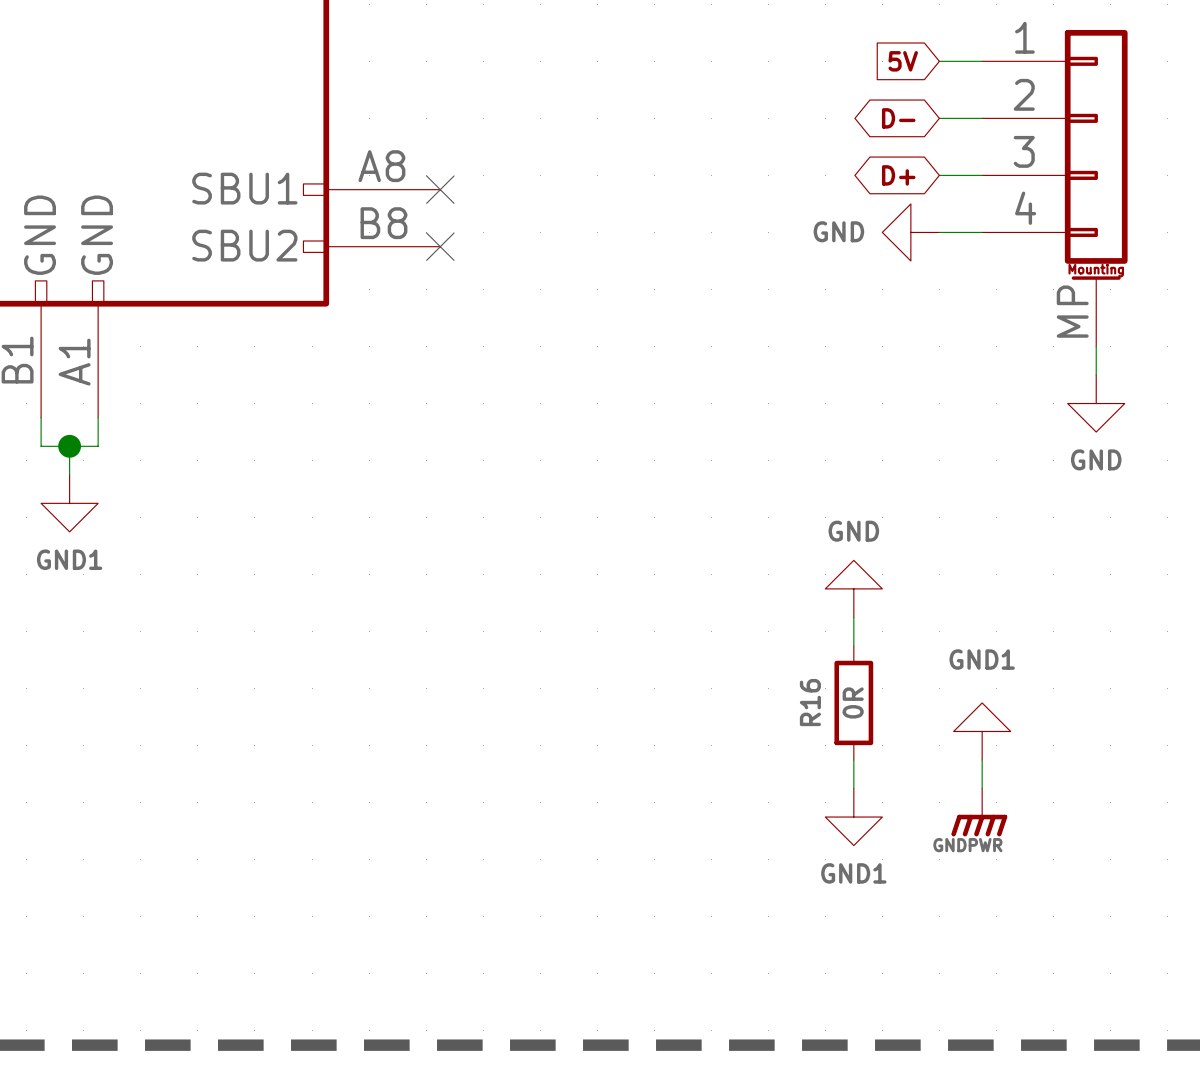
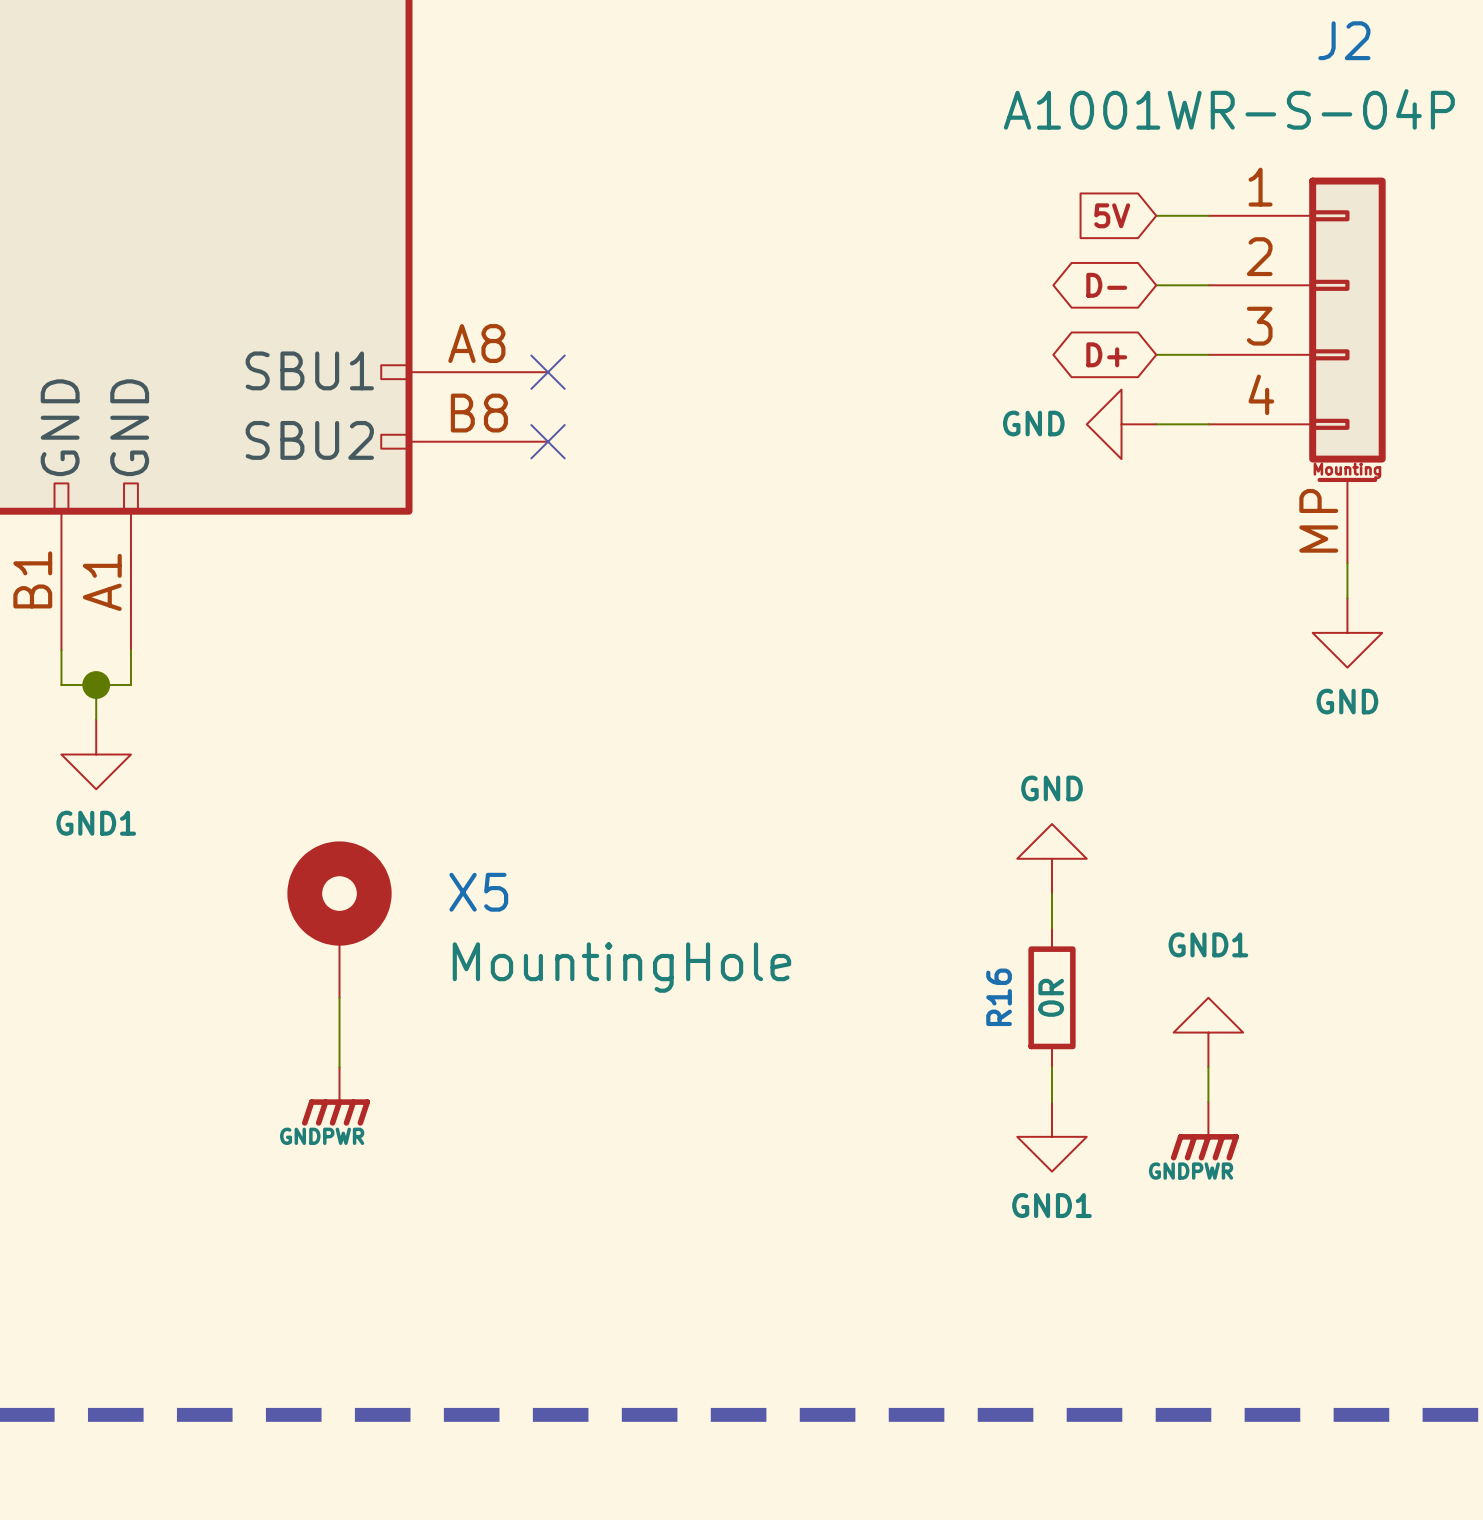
X5: none -> MountingHole (339, 919)
wire: none -> (339, 997) (339, 1067)
power symbol: none -> GNDPWR (336, 1096)

